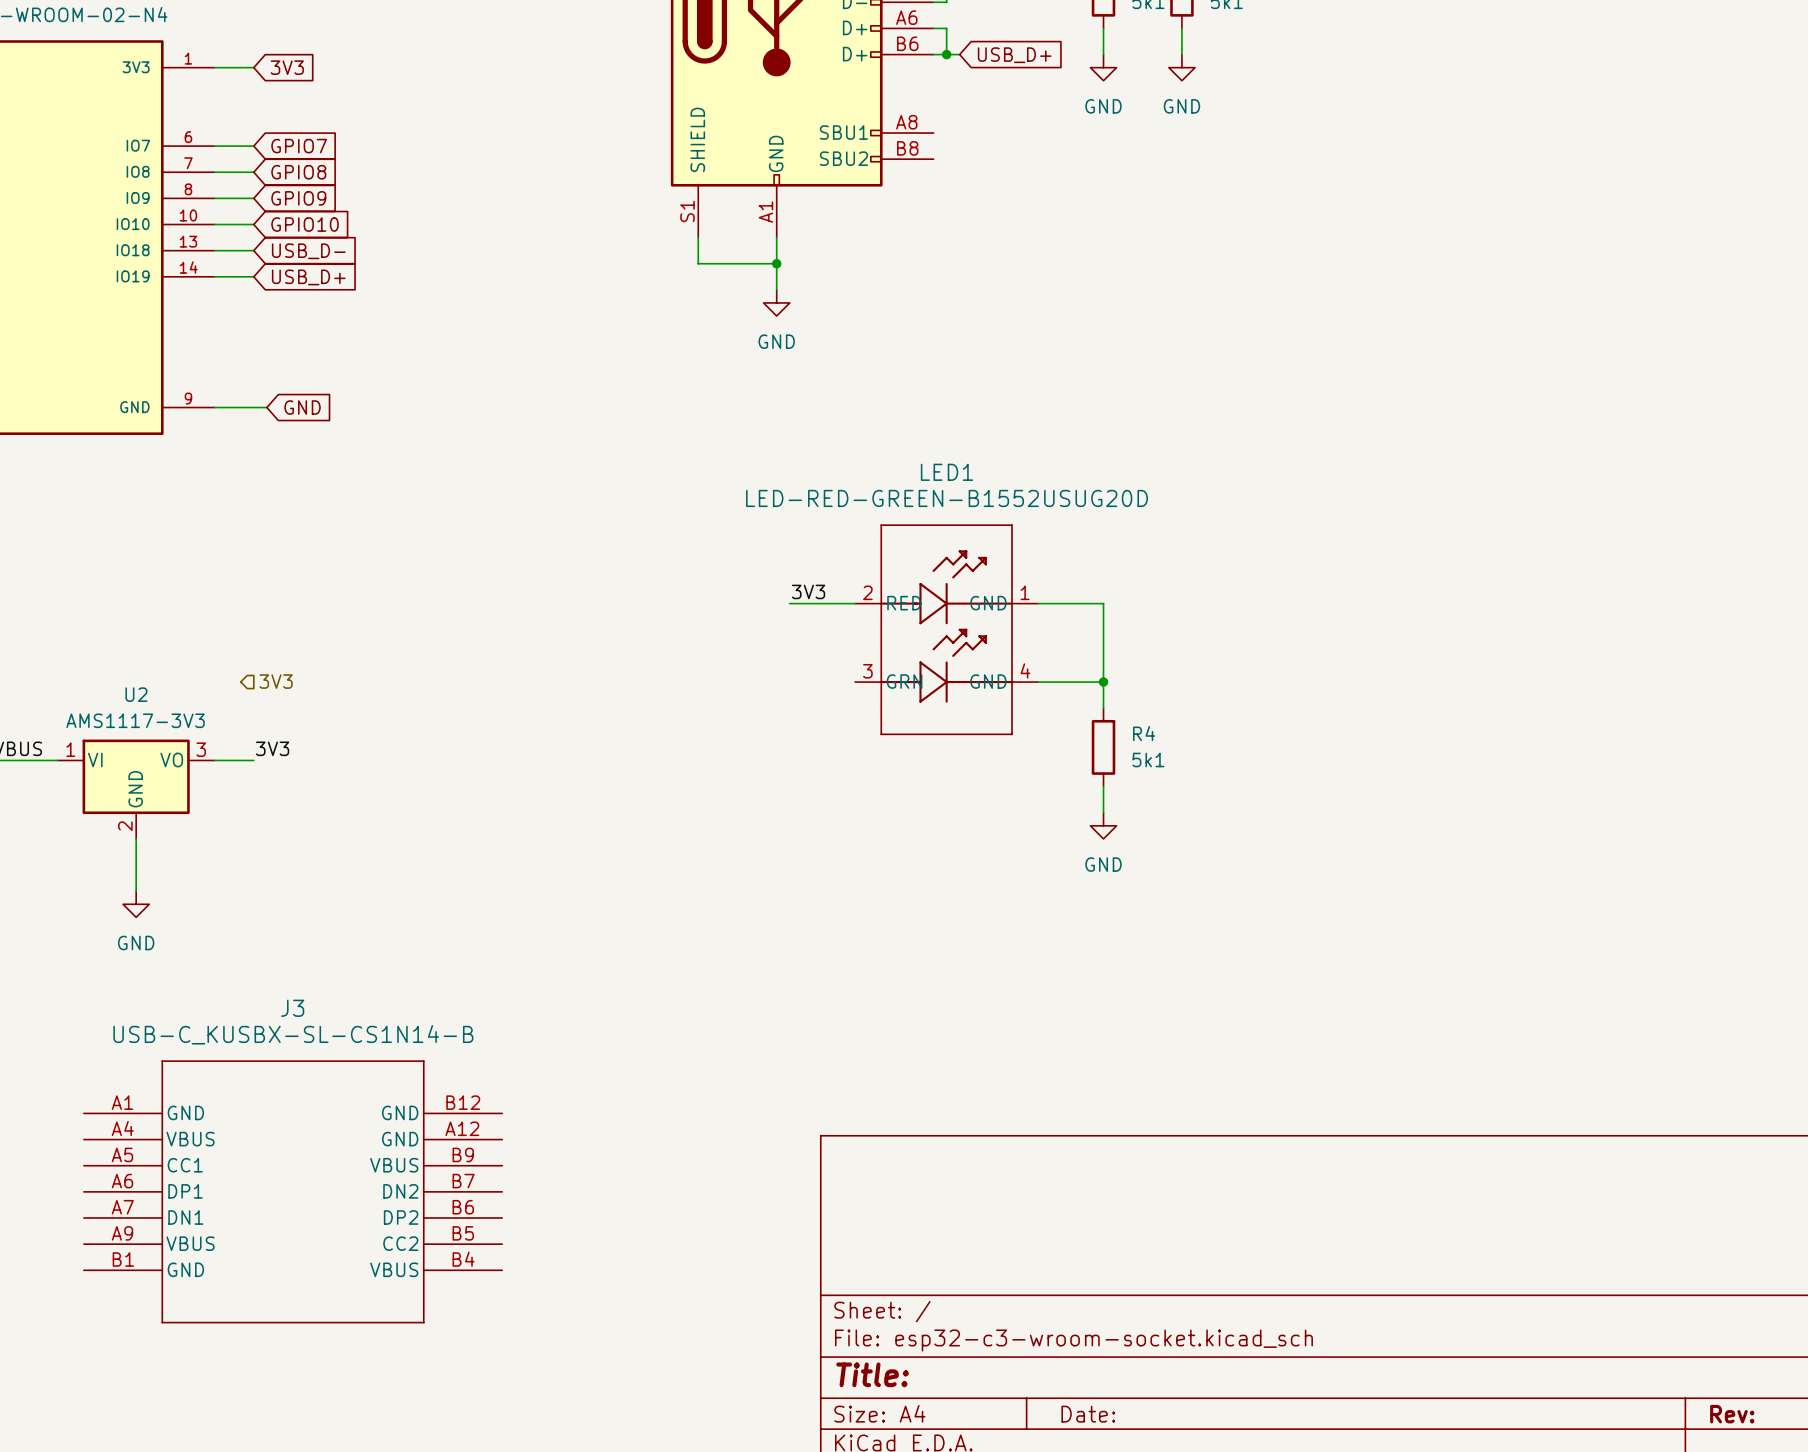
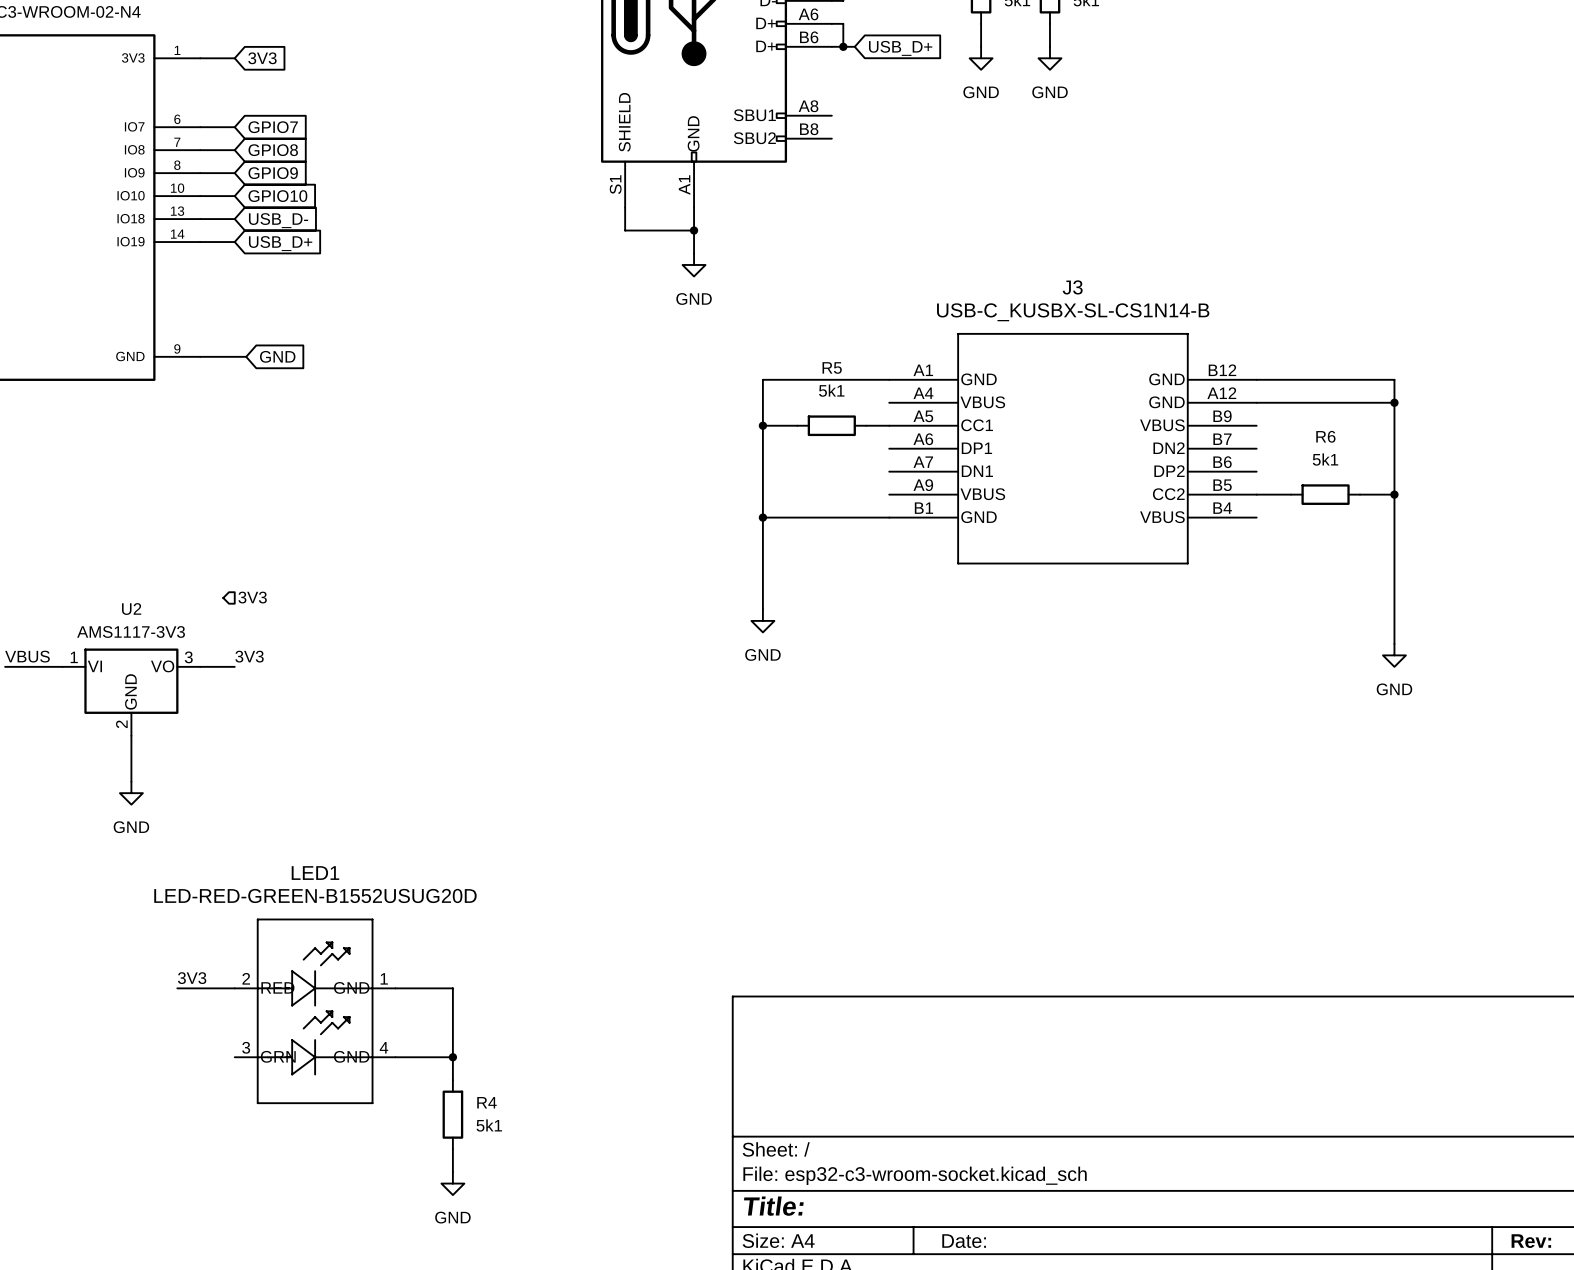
wire: none -> (889, 379) (762, 379) (762, 609)
wire: none -> (1256, 379) (1394, 379) (1394, 643)
wire: none -> (1256, 402) (1394, 402)
junction: none -> (1394, 402)
wire: none -> (762, 425) (797, 425)
junction: none -> (762, 425)
R5: none -> 5k1 (831, 425)
wire: none -> (866, 425) (889, 425)
wire: none -> (1256, 494) (1291, 494)
R6: none -> 5k1 (1325, 494)
wire: none -> (1360, 494) (1394, 494)
junction: none -> (1394, 494)
wire: none -> (762, 517) (889, 517)
junction: none -> (762, 517)
label: 3V3 (808, 591) -> none
wire: (789, 603) (855, 603) -> none
wire: (1038, 603) (1103, 603) (1103, 708) -> none
LED1 position: (946, 629) -> (315, 1011)
wire: (1038, 682) (1103, 682) -> none
junction: (1103, 682) -> none
power symbol: none -> GND (762, 620)
R4 position: (1103, 747) -> (452, 1114)
power symbol: none -> GND (1394, 655)
wire: (1103, 786) (1103, 812) -> none
power symbol: GND (1103, 825) -> none
label: none -> 3V3 (192, 978)
wire: none -> (177, 988) (234, 988)
wire: none -> (395, 988) (452, 988) (452, 1080)
J3 position: (293, 1191) -> (1072, 448)
wire: none -> (395, 1057) (452, 1057)
junction: none -> (452, 1057)
wire: none -> (452, 1149) (452, 1172)
power symbol: none -> GND (452, 1183)

